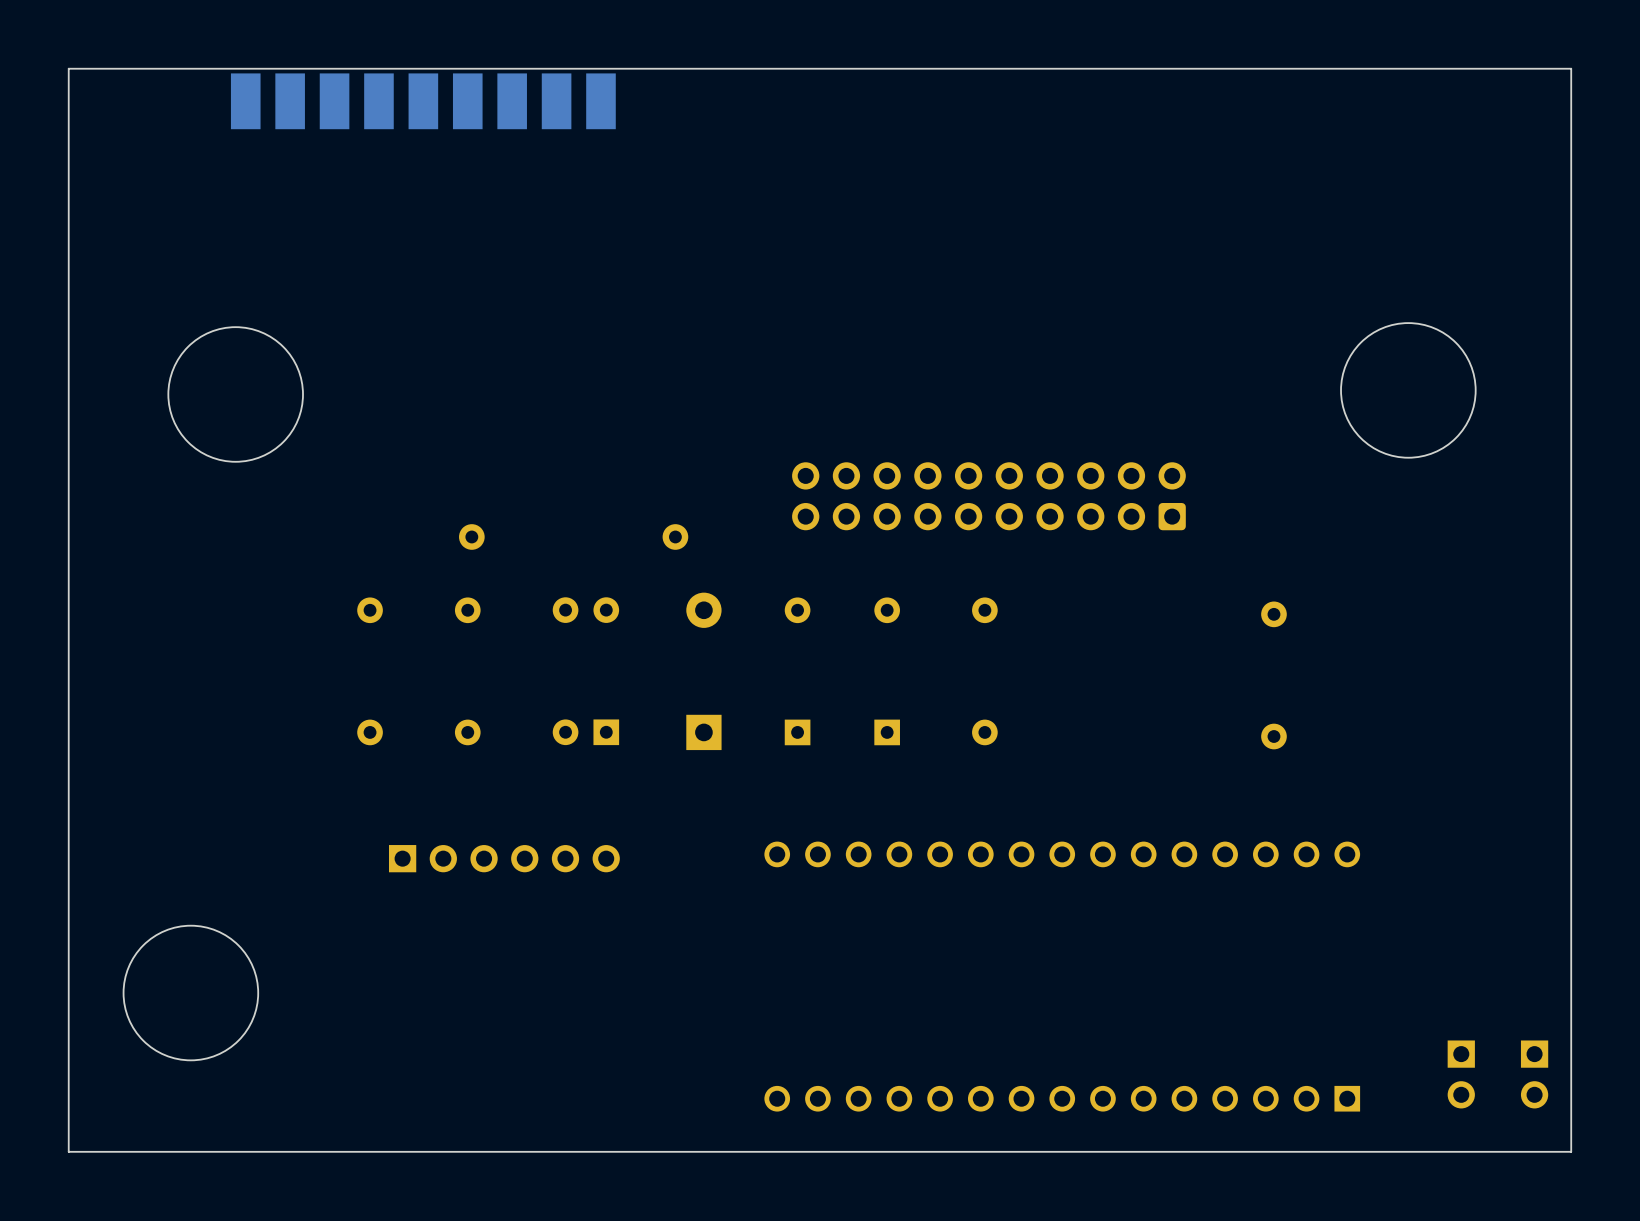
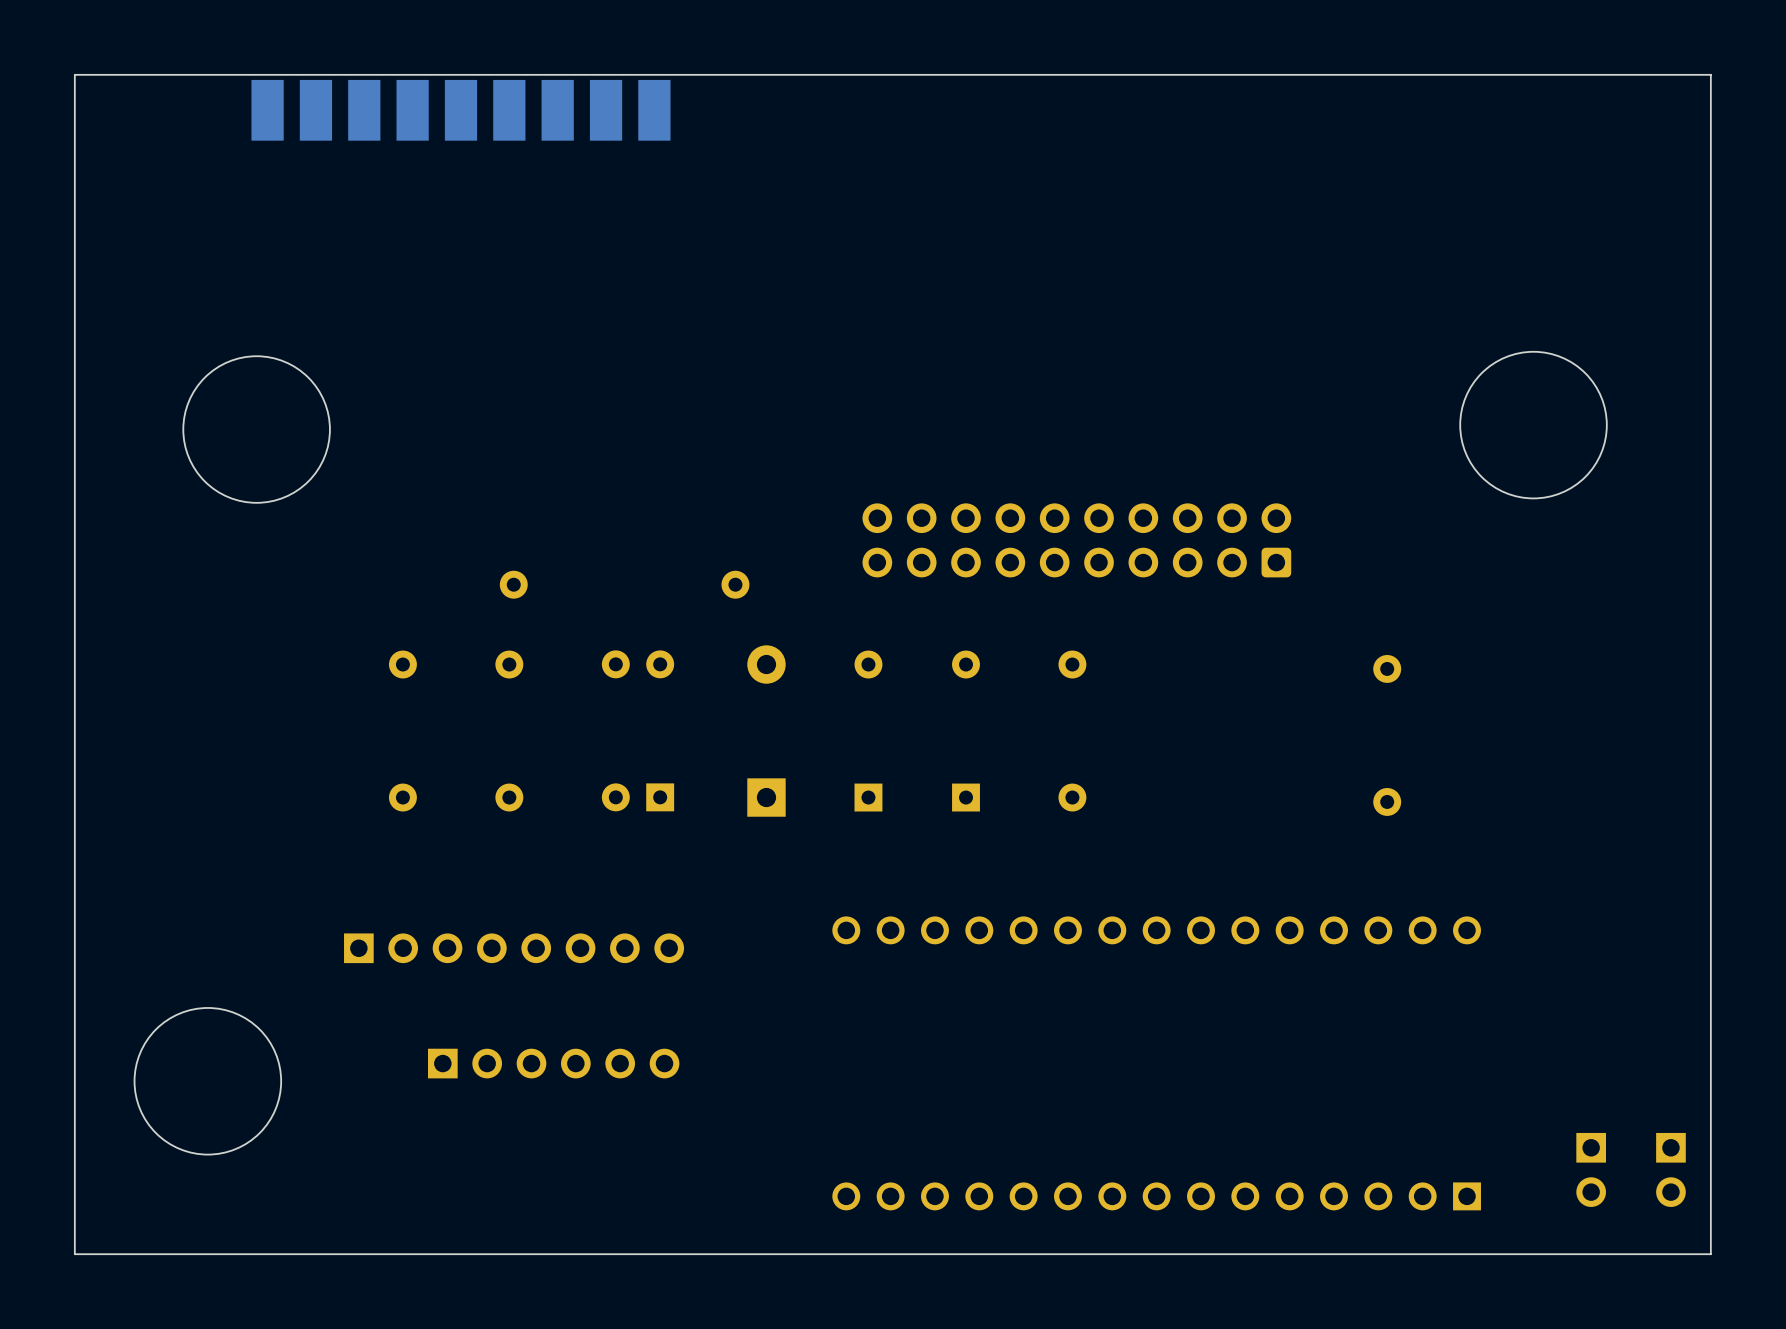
part position: (504, 858) -> (553, 1063)
part: none -> (514, 948)

